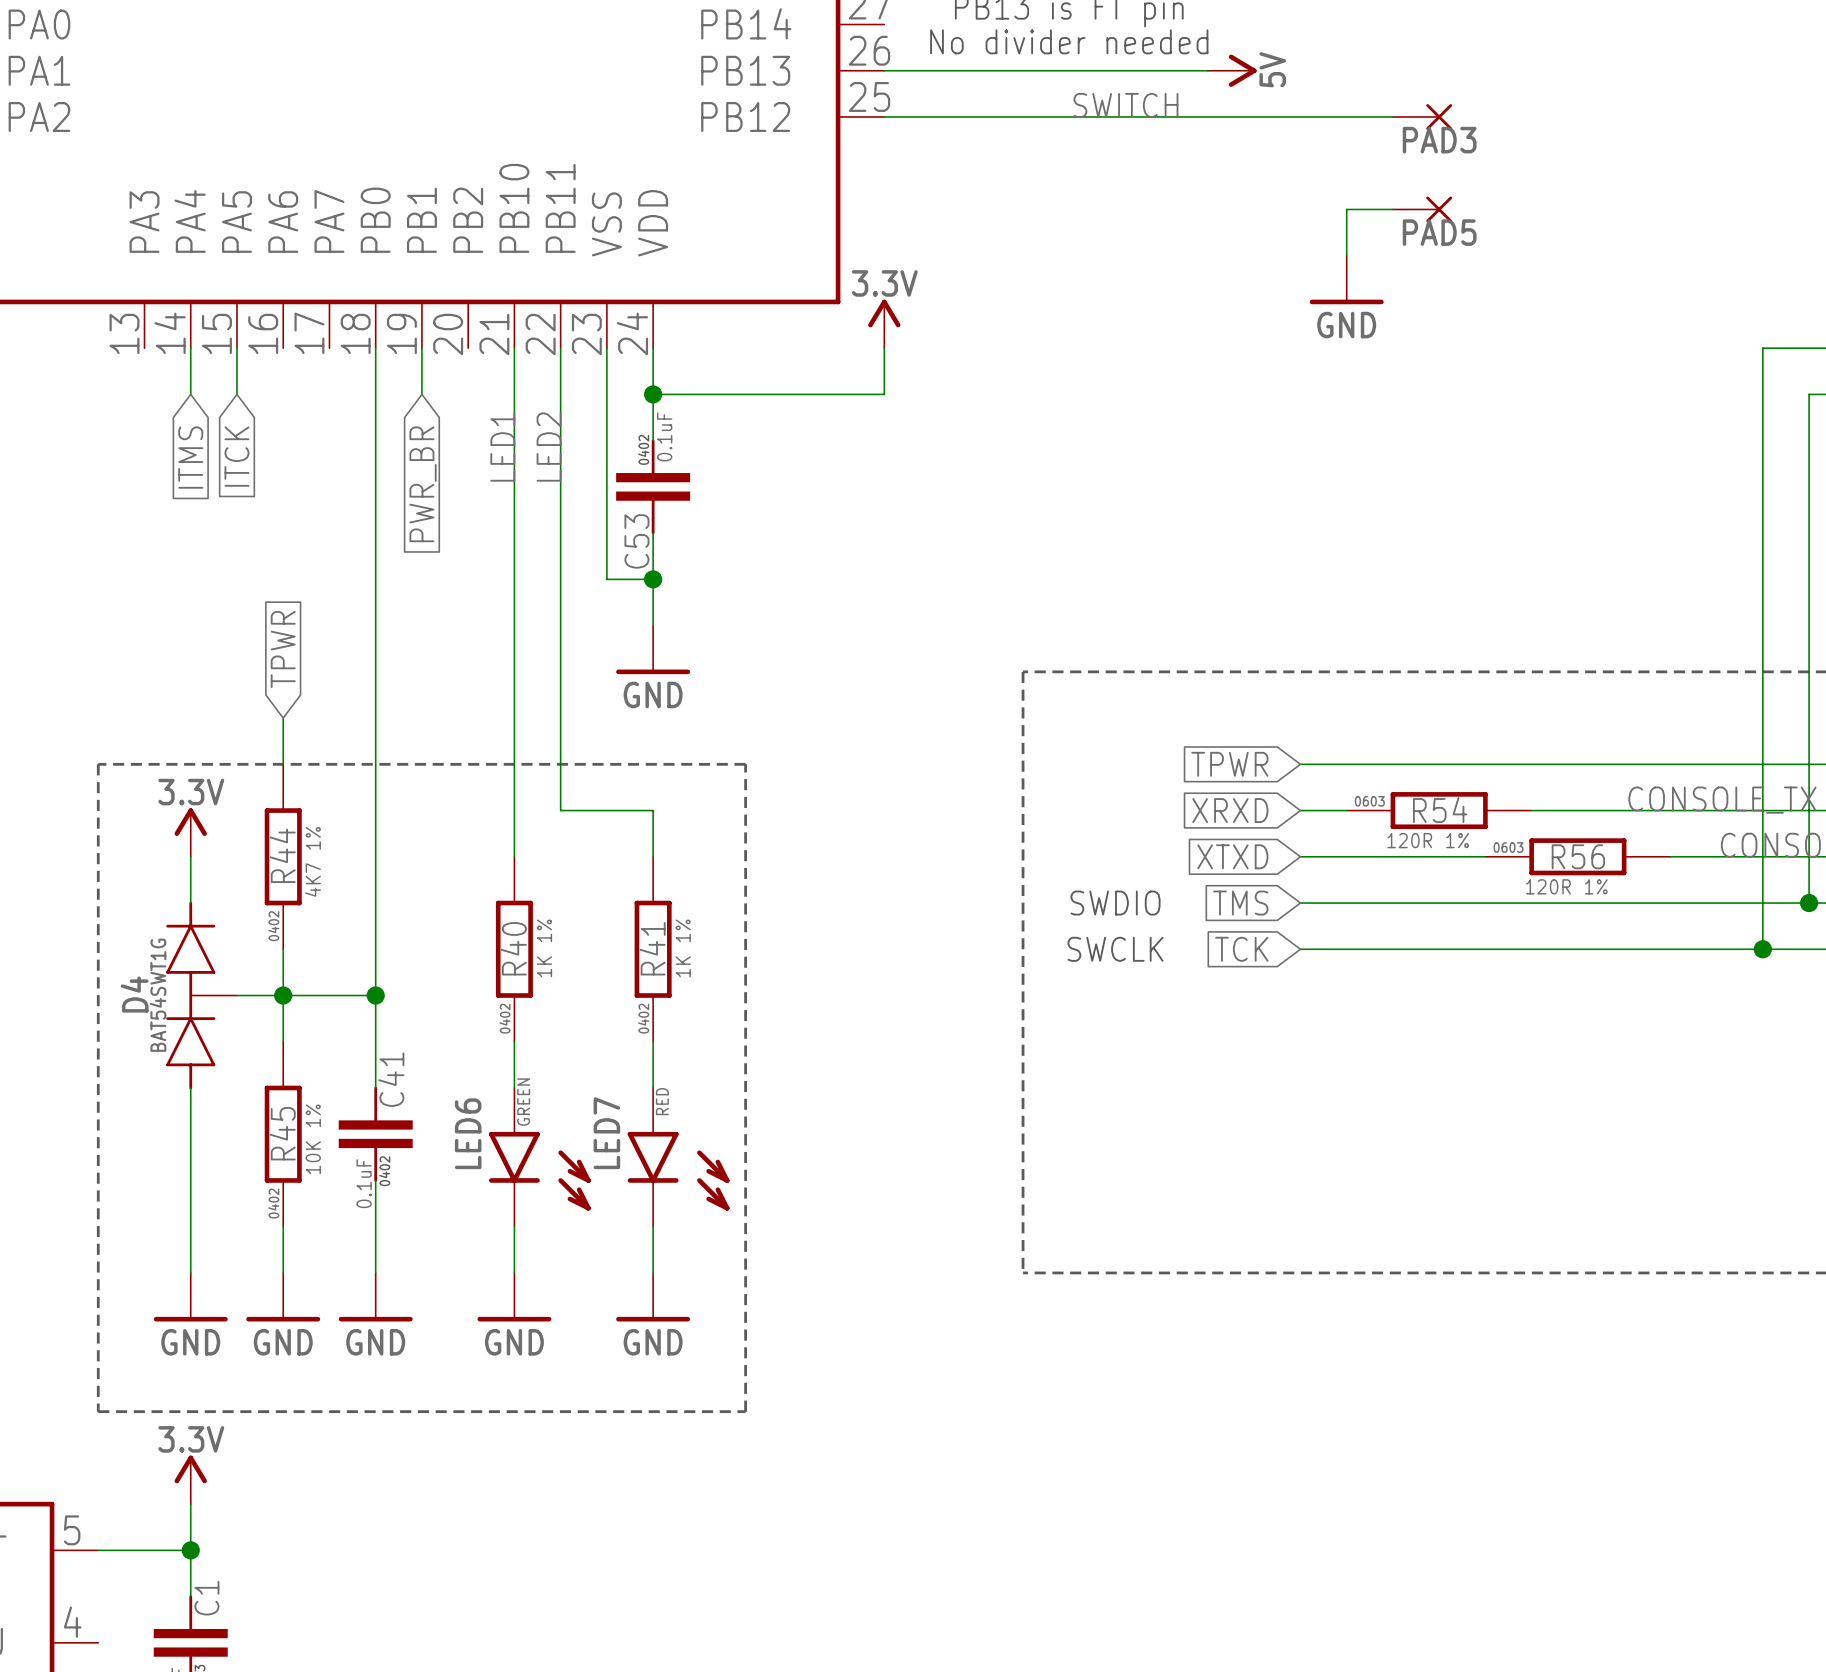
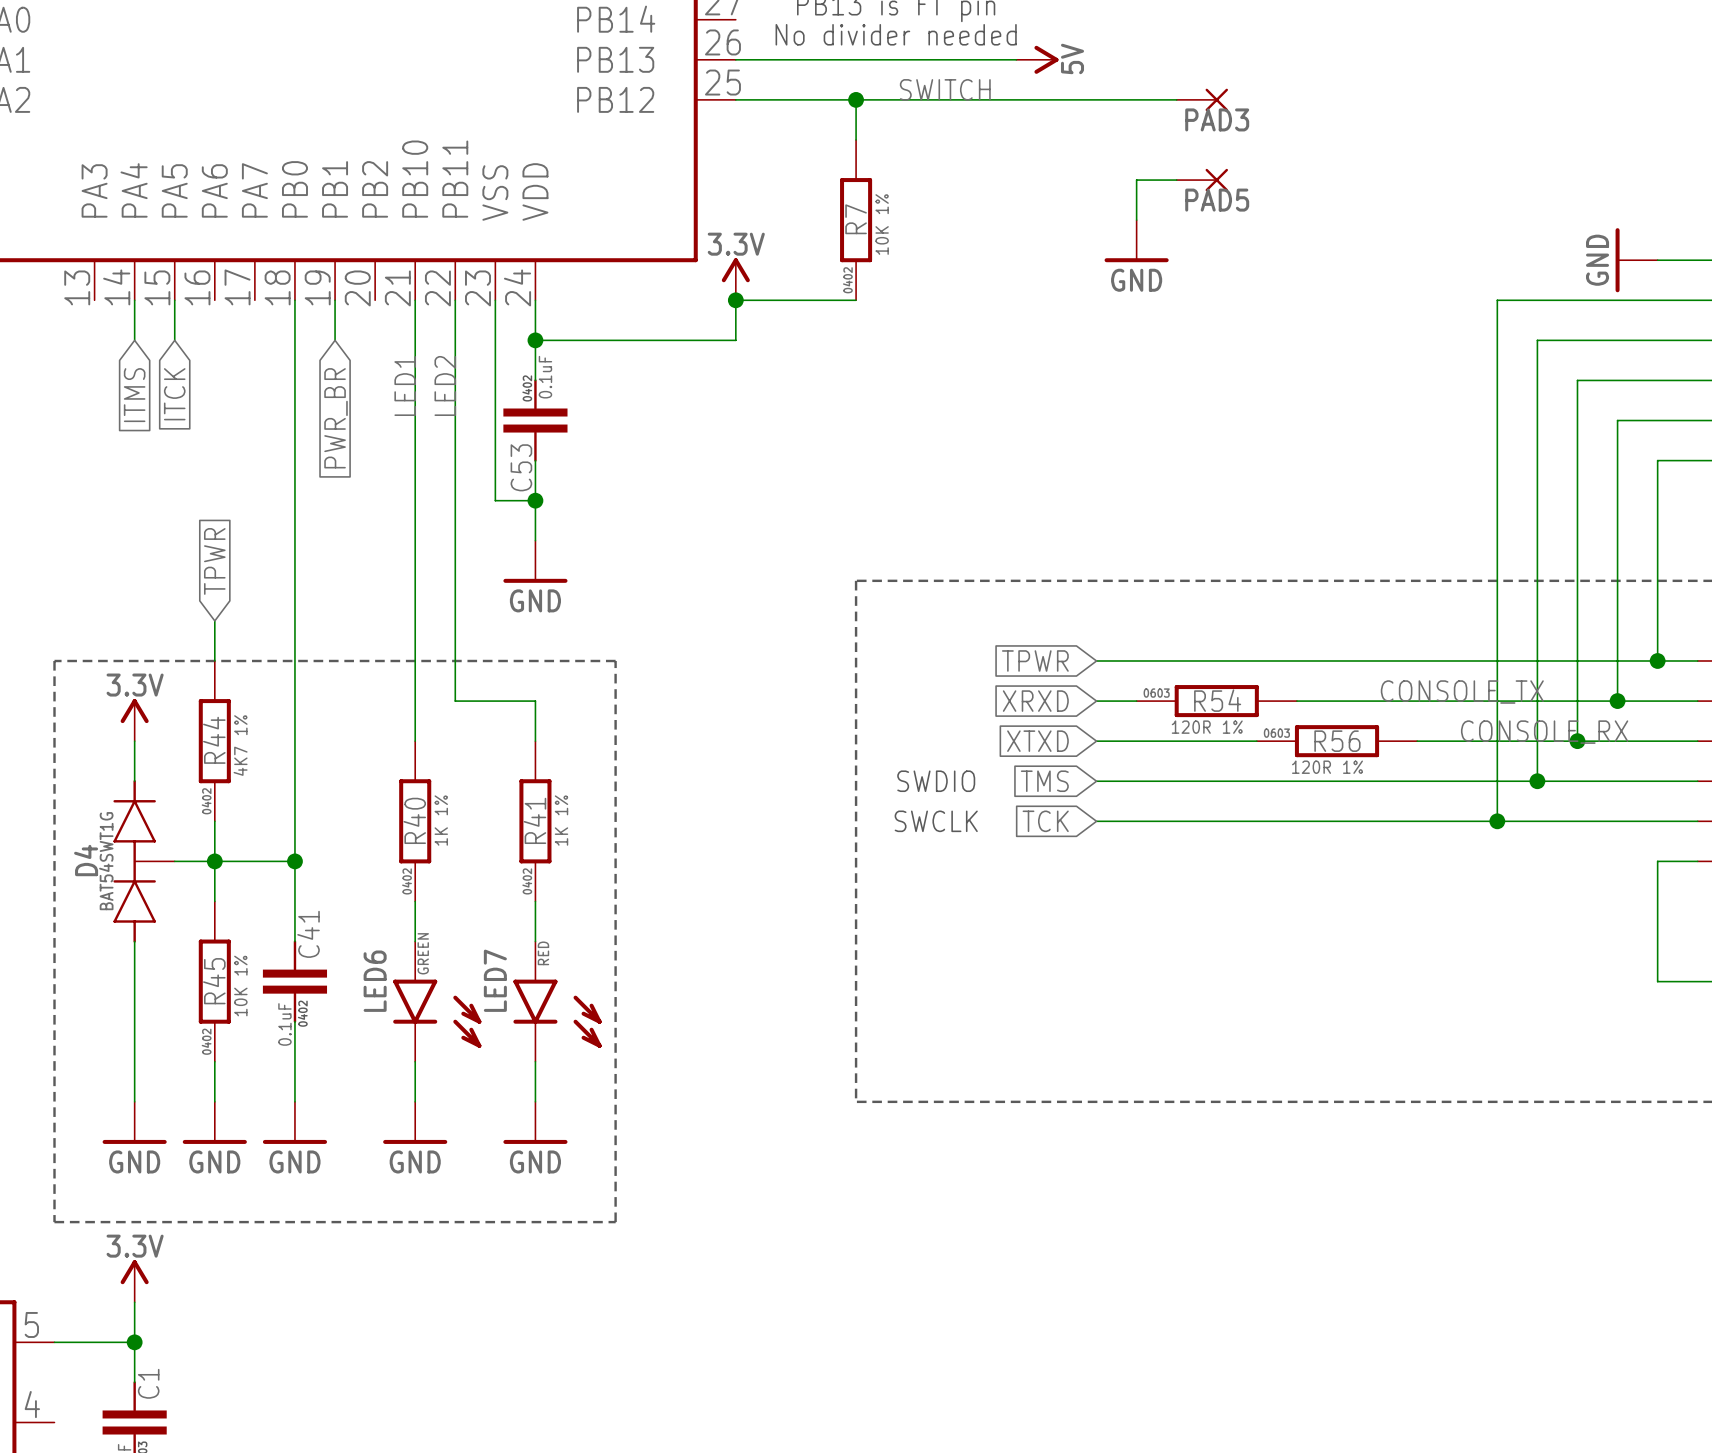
wire: none -> (856, 99) (856, 139)
junction: none -> (856, 99)
R7: none -> 10K (856, 220)
wire: none -> (735, 300) (856, 300)
junction: none -> (735, 300)

